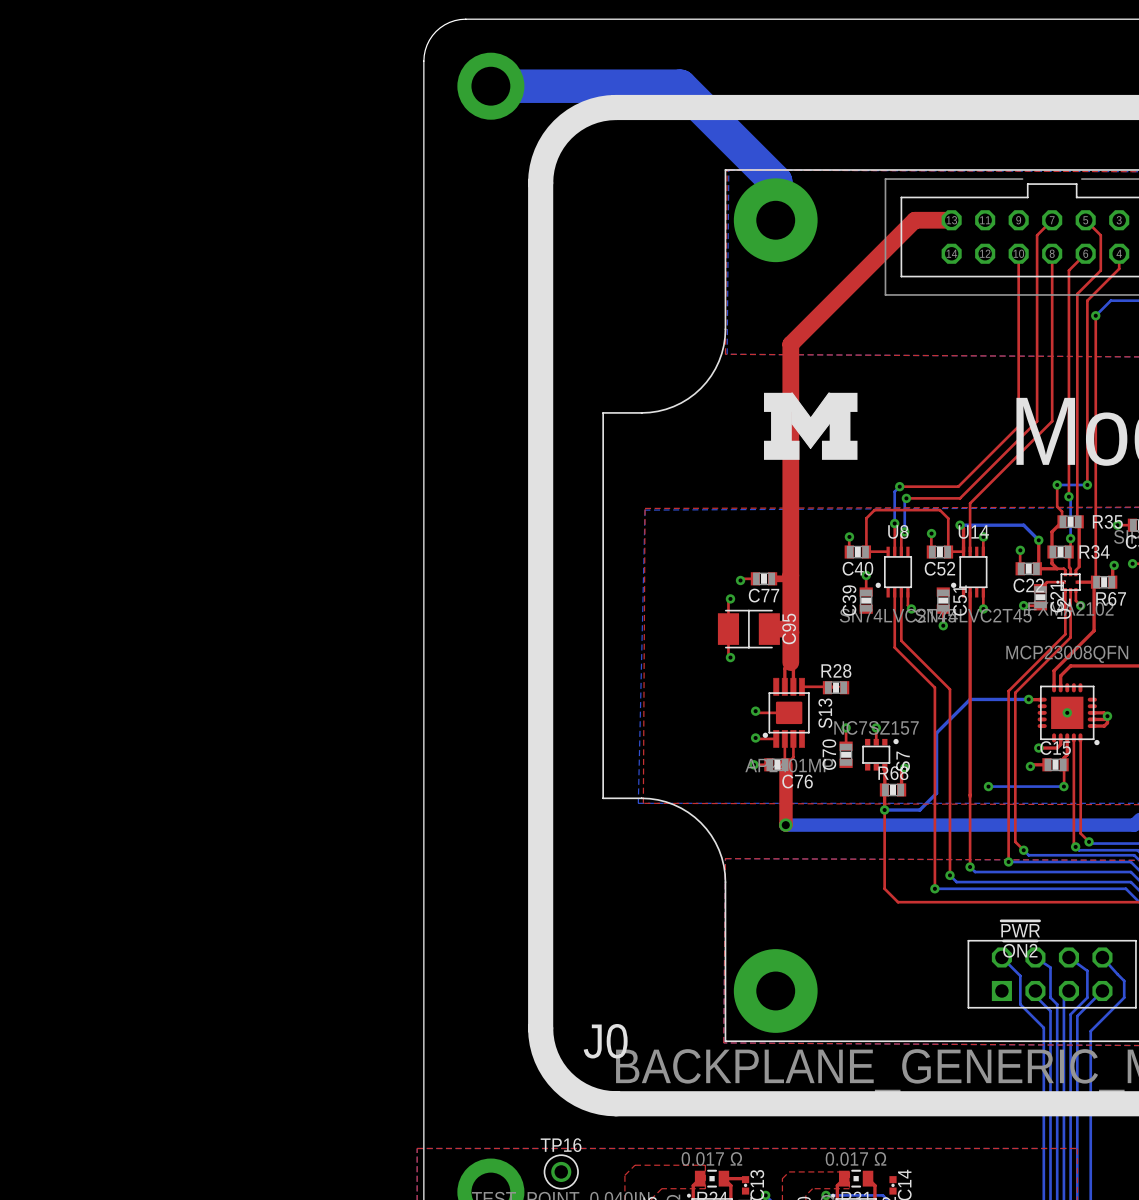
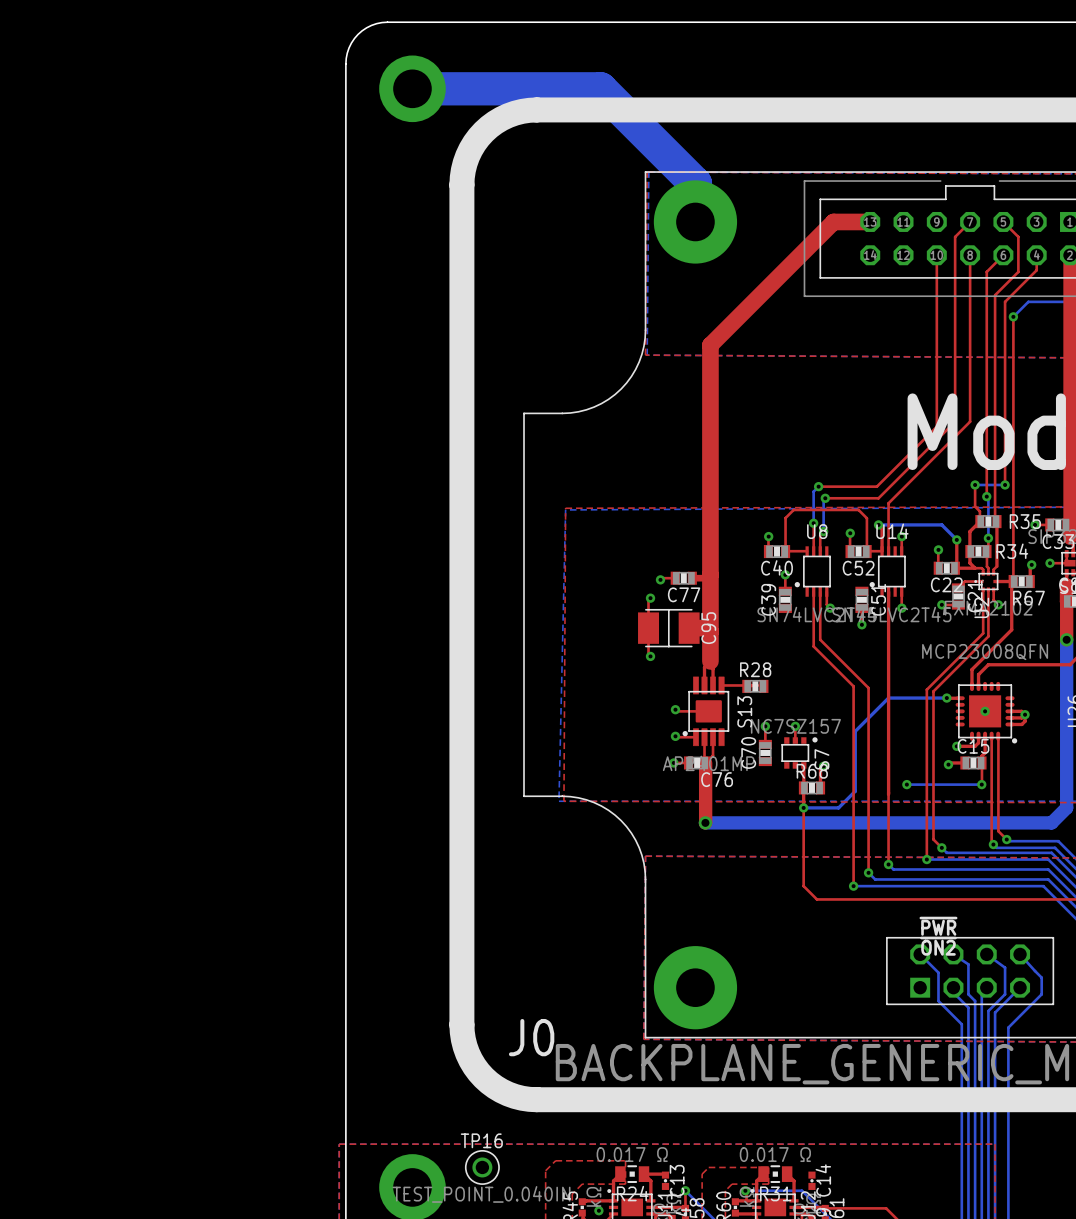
drawing: [764, 392, 858, 460] -> none

